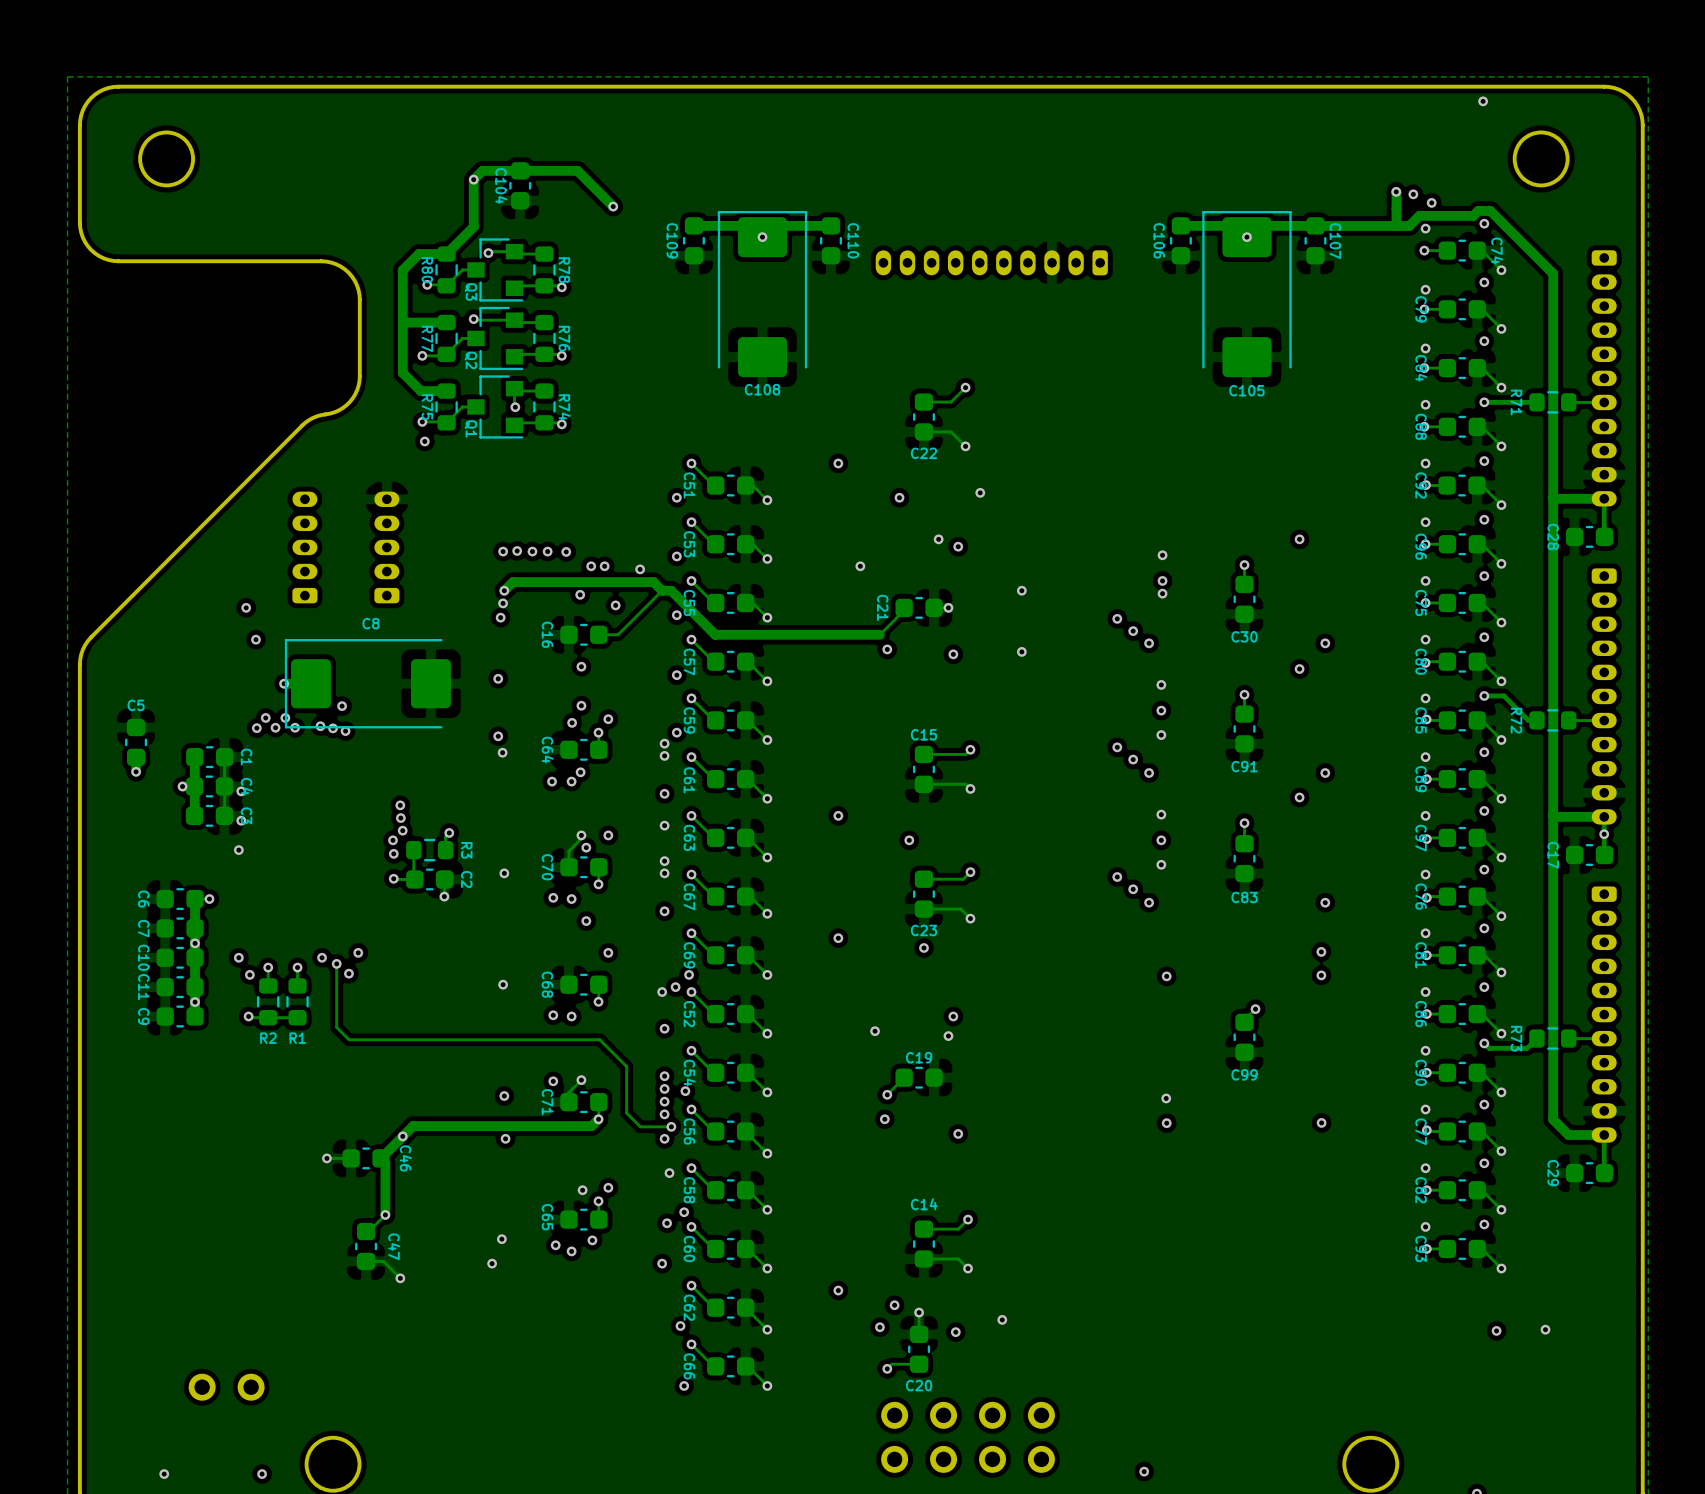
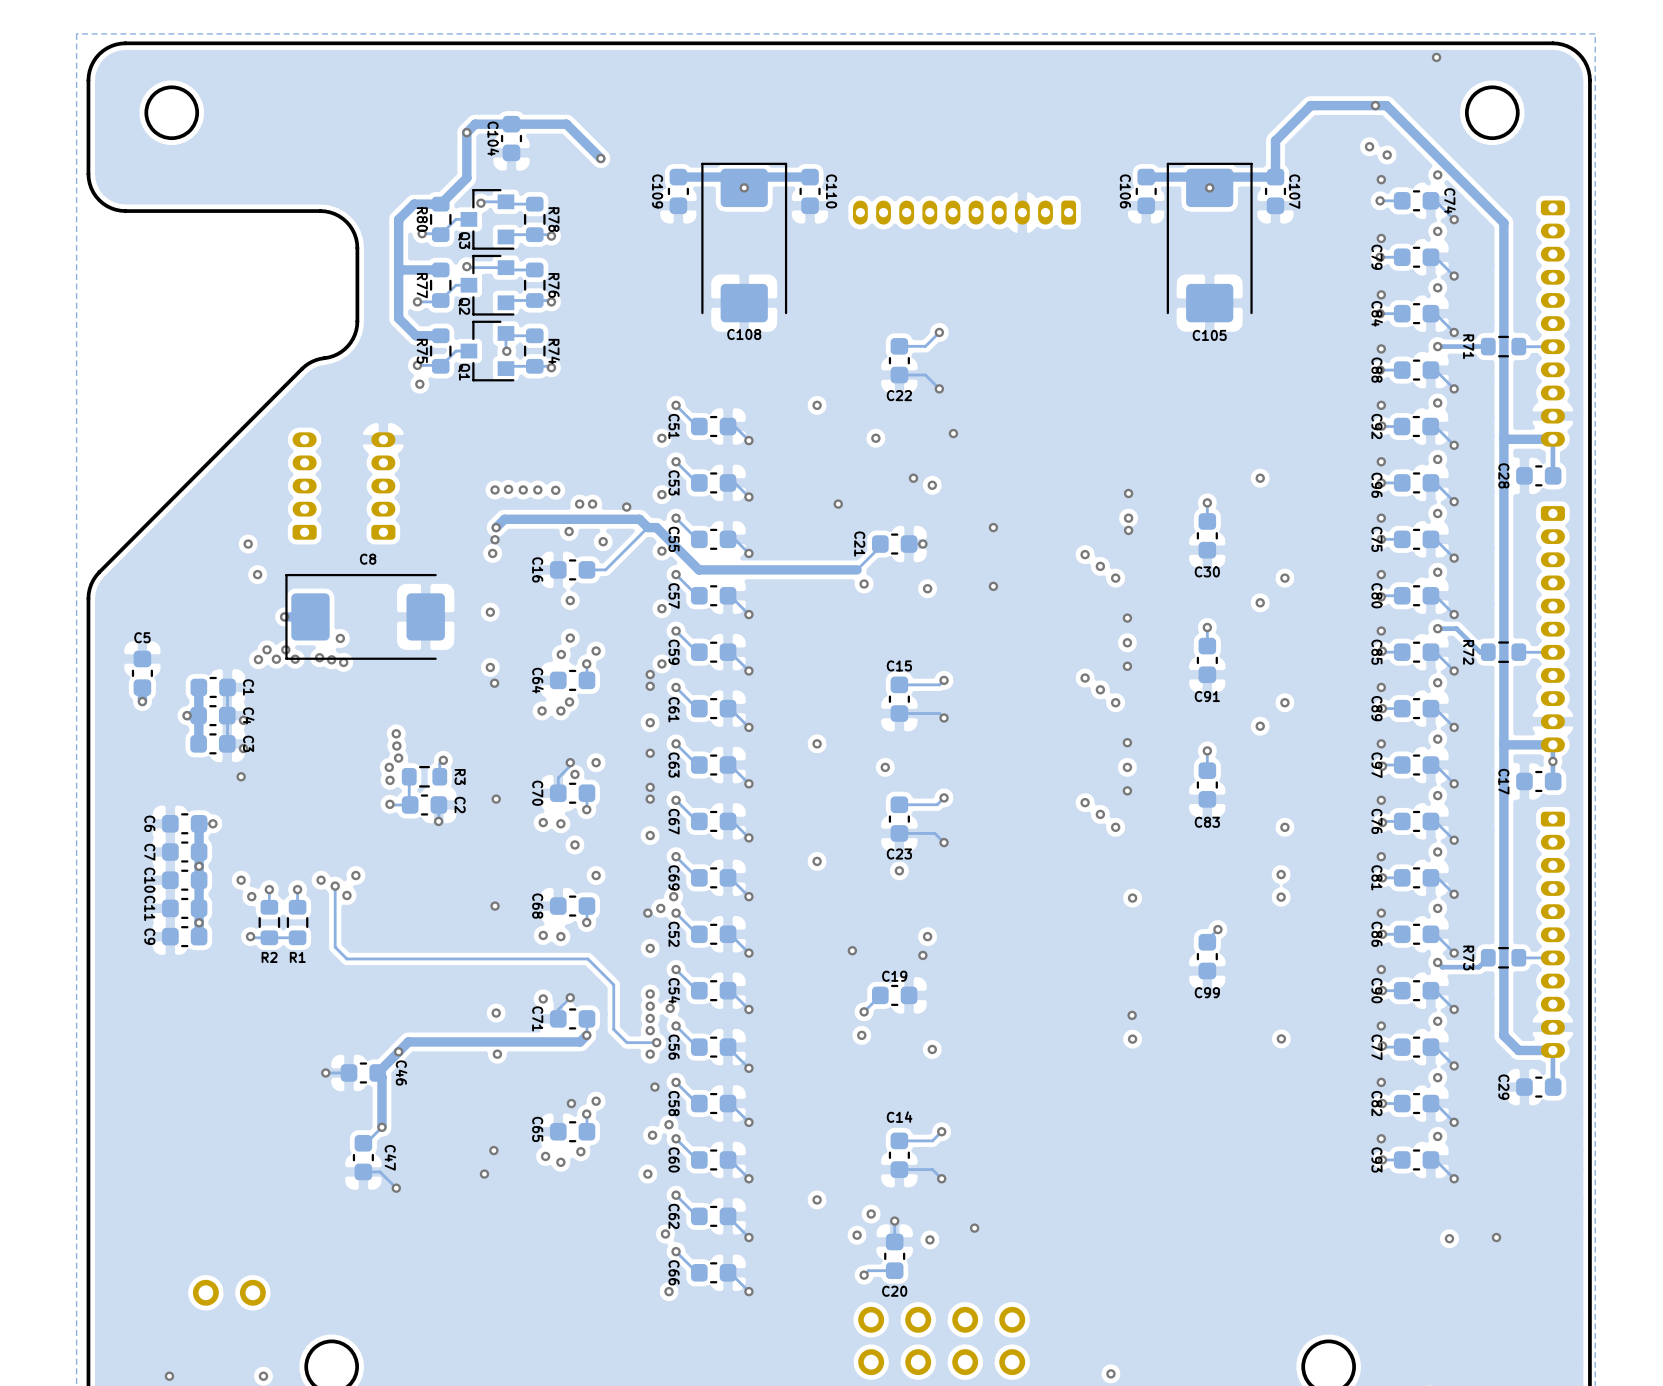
via position: (1396, 191) -> (1375, 105)
track: (1396, 192) (1396, 225) -> none
track: (1490, 210) (1478, 210) (1473, 215) (1419, 215) (1409, 225) (1315, 225) -> (1443, 162) (1386, 105) (1310, 105) (1275, 140) (1275, 177)

